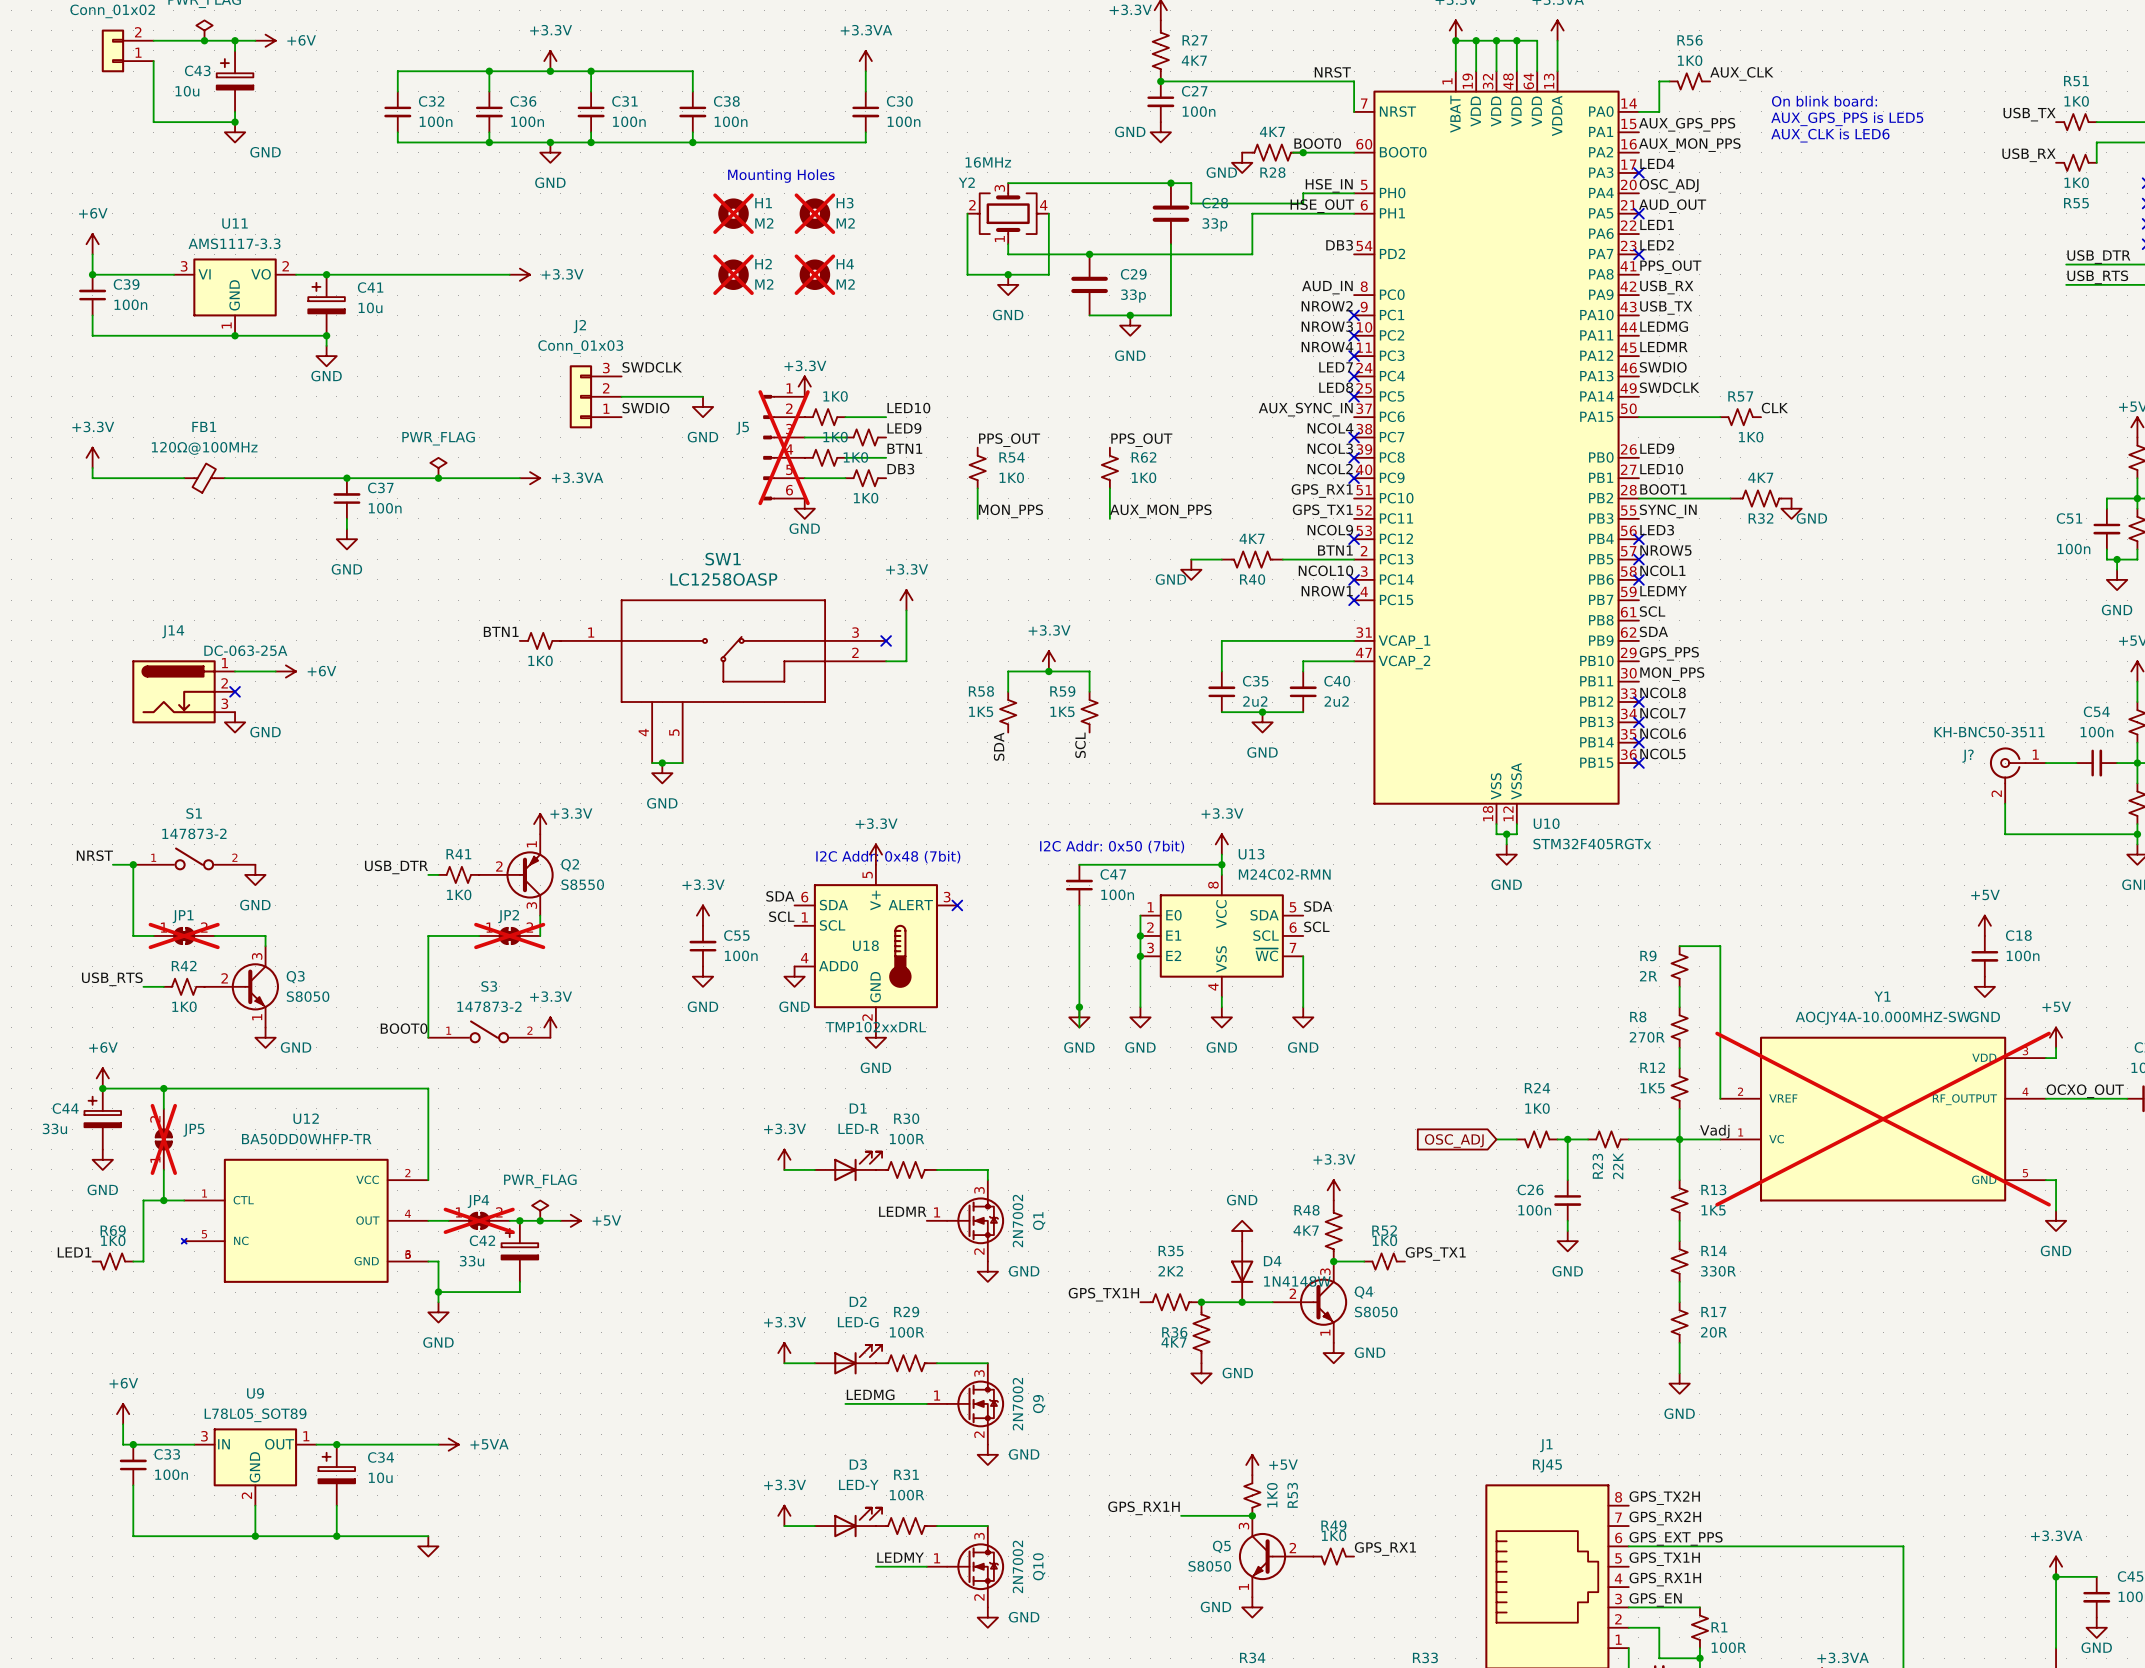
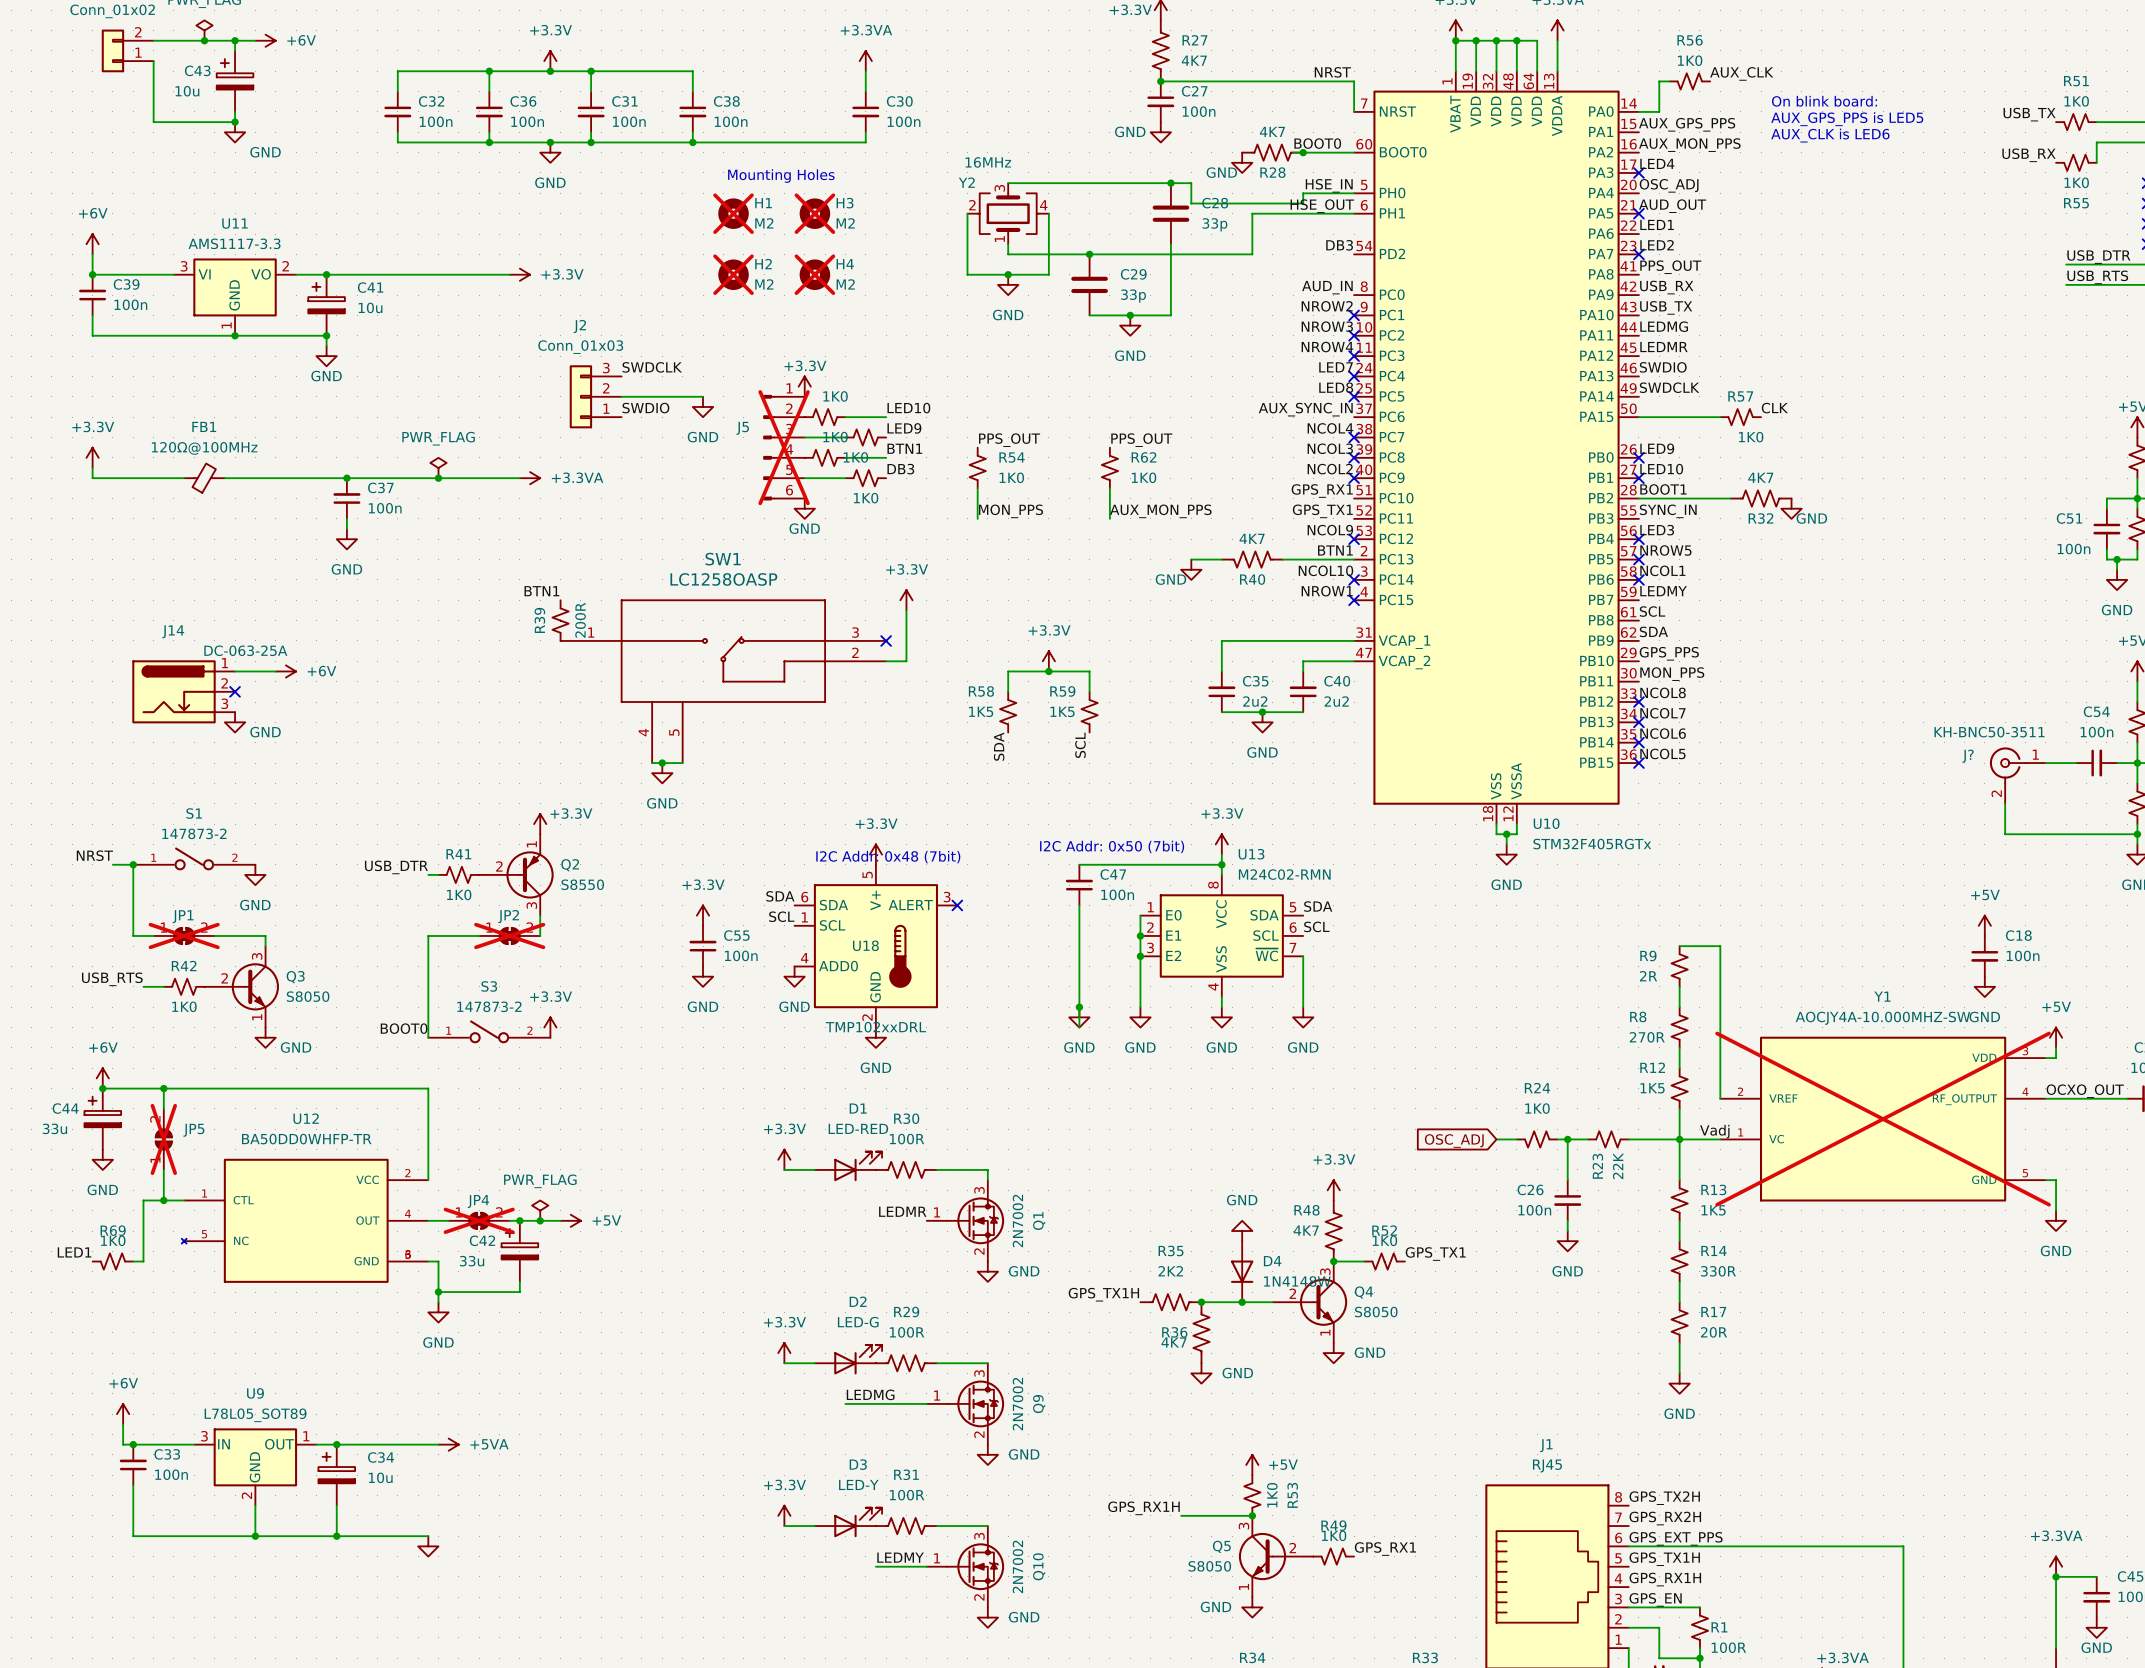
no-connect mark: none -> (1638, 457)
no-connect mark: none -> (1638, 478)
R39: none -> 200R (560, 620)
label position: BTN1 (501, 631) -> BTN1 (541, 591)
part: 1K0 (540, 640) -> none
D1 value: LED-R (858, 1128) -> LED-RED (858, 1128)

